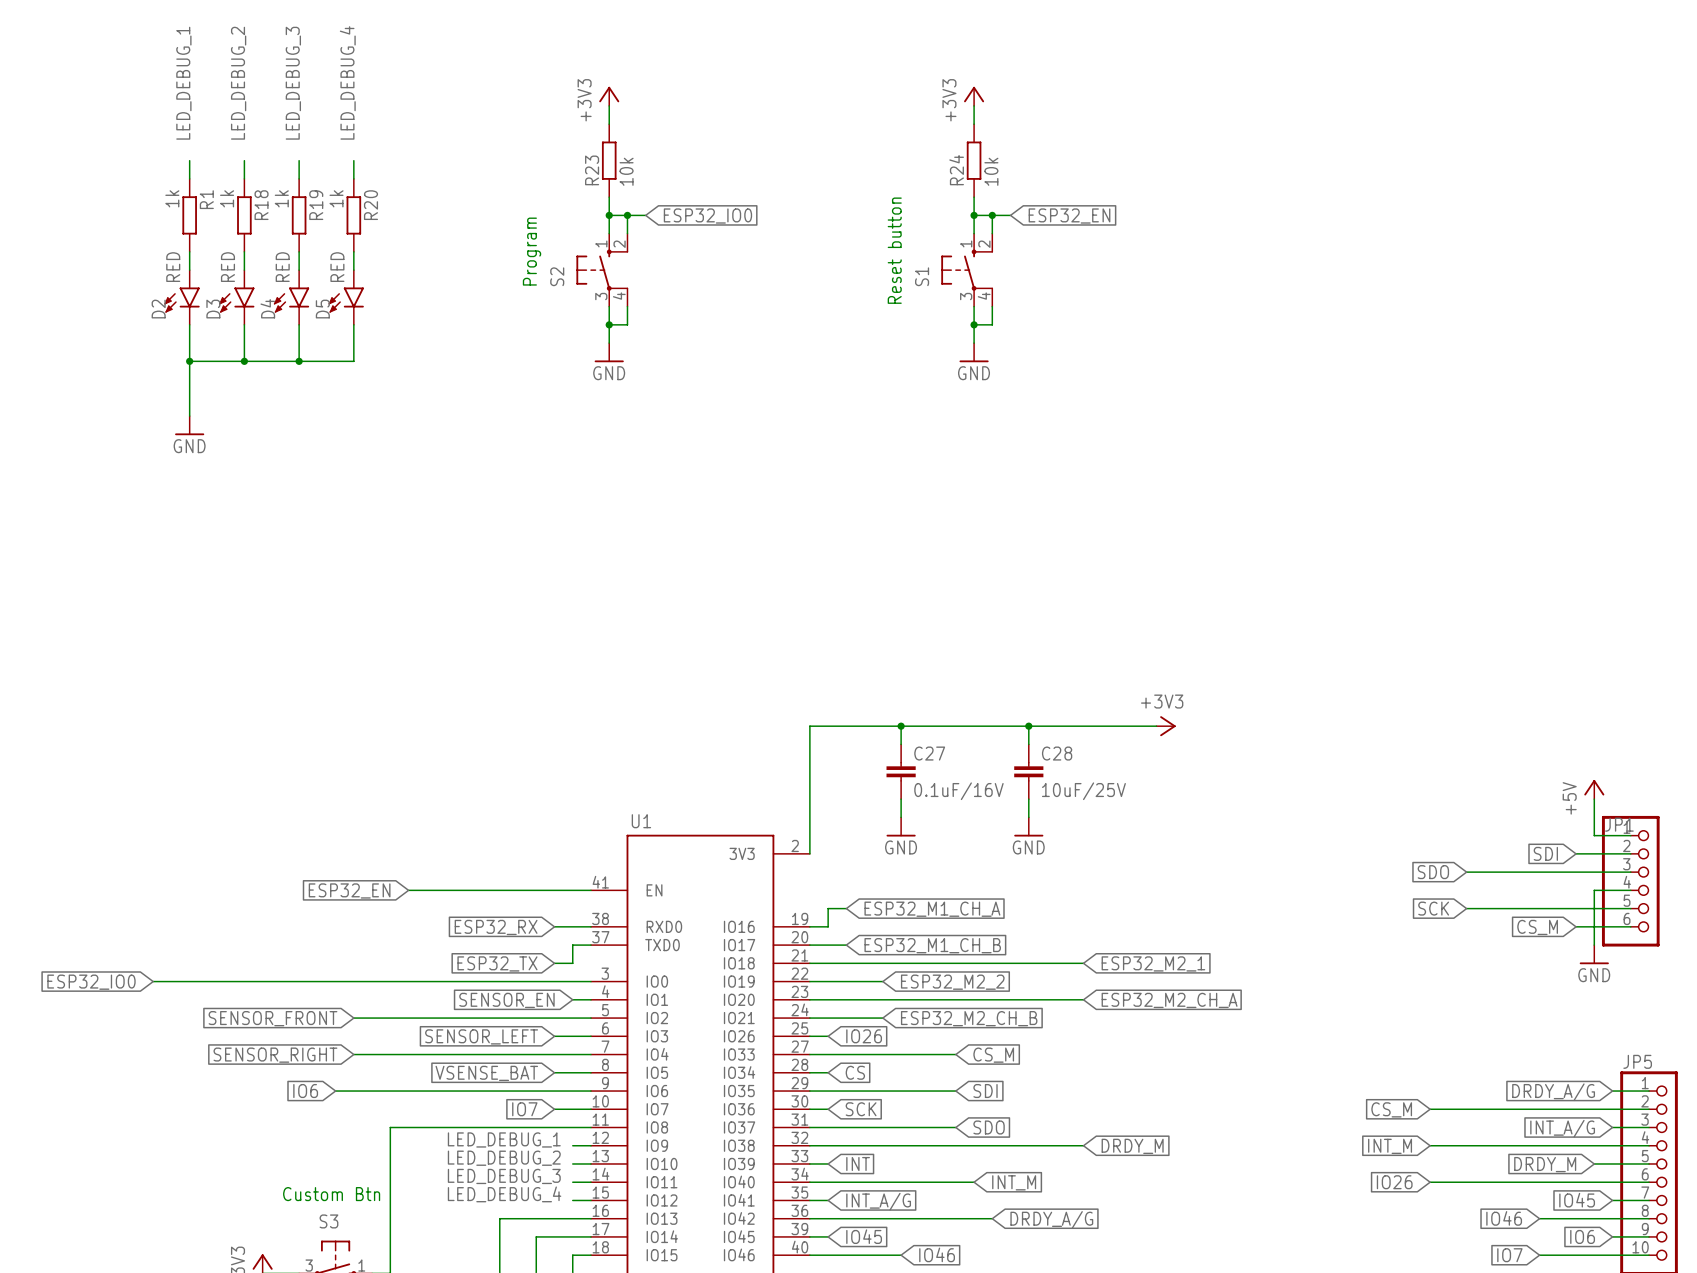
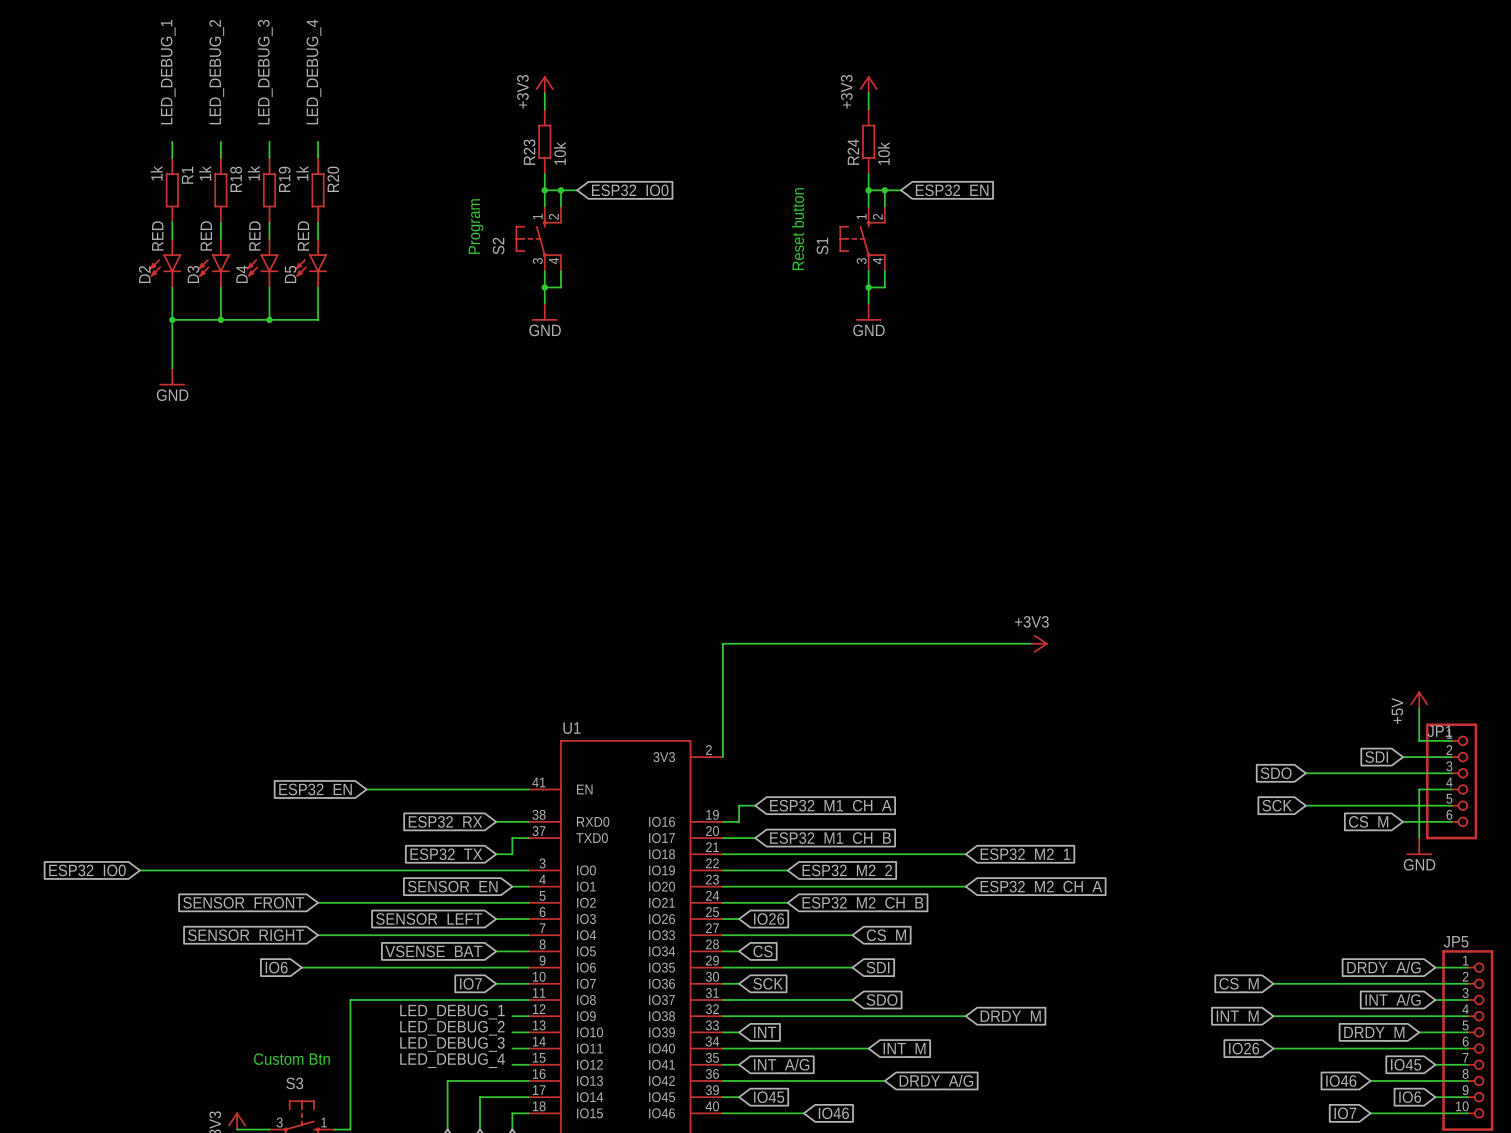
wire: (901, 726) (901, 744) -> none
junction: (901, 726) -> none
wire: (1028, 726) (1028, 744) -> none
junction: (1028, 726) -> none
C27: 0.1uF/16V (901, 771) -> none
C28: 10uF/25V (1028, 771) -> none
wire: (901, 799) (901, 817) -> none
wire: (1028, 799) (1028, 817) -> none
power symbol: GND (901, 826) -> none
power symbol: GND (1028, 826) -> none

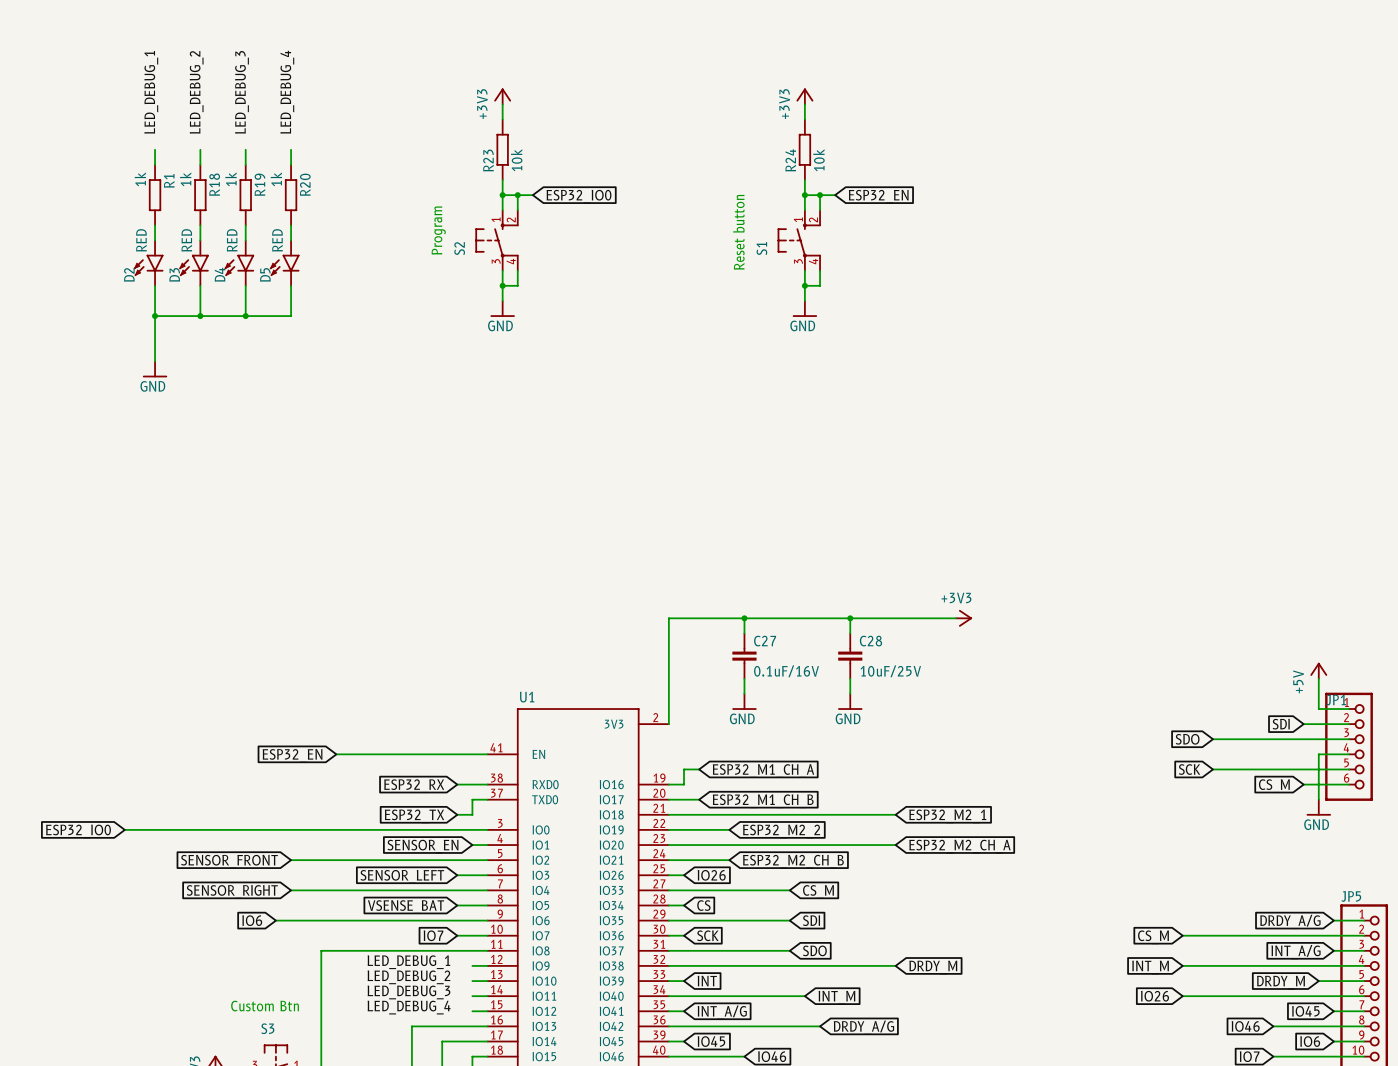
wire: none -> (744, 618) (744, 633)
junction: none -> (744, 618)
wire: none -> (850, 618) (850, 633)
junction: none -> (850, 618)
C27: none -> 0.1uF/16V (744, 656)
C28: none -> 10uF/25V (850, 656)
wire: none -> (744, 678) (744, 693)
wire: none -> (850, 678) (850, 693)
power symbol: none -> GND (744, 701)
power symbol: none -> GND (850, 701)

